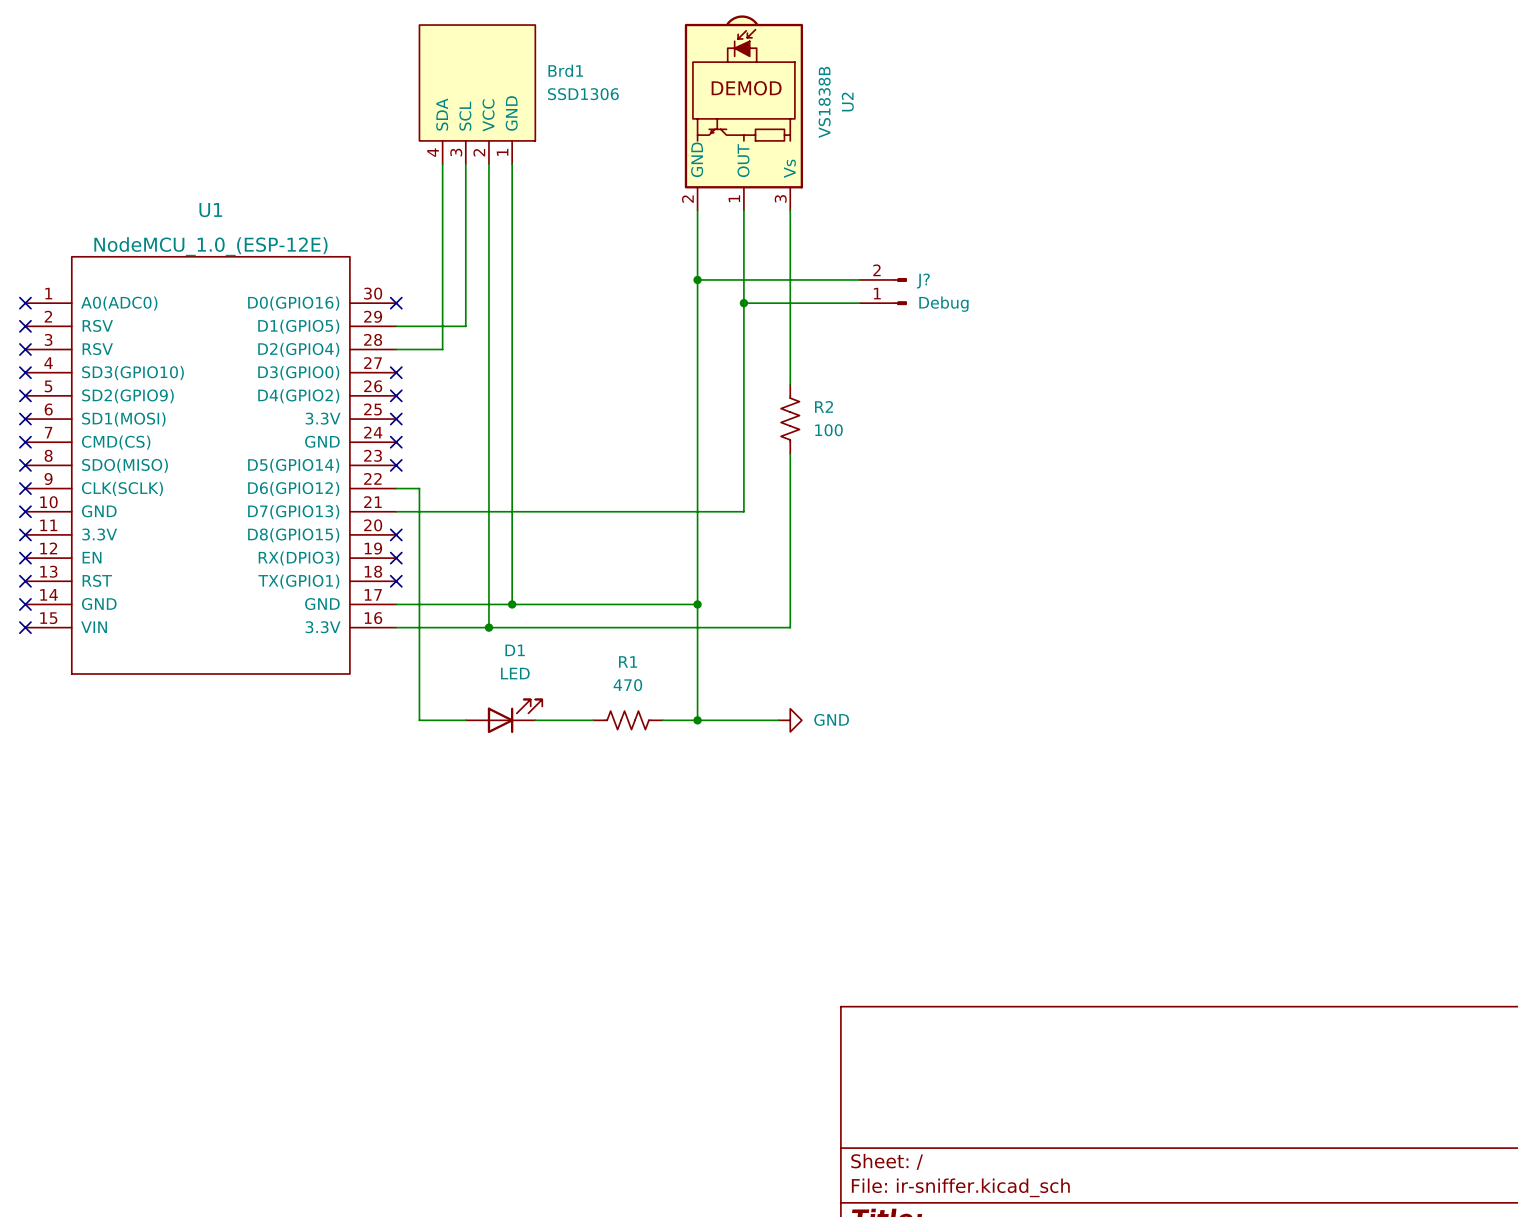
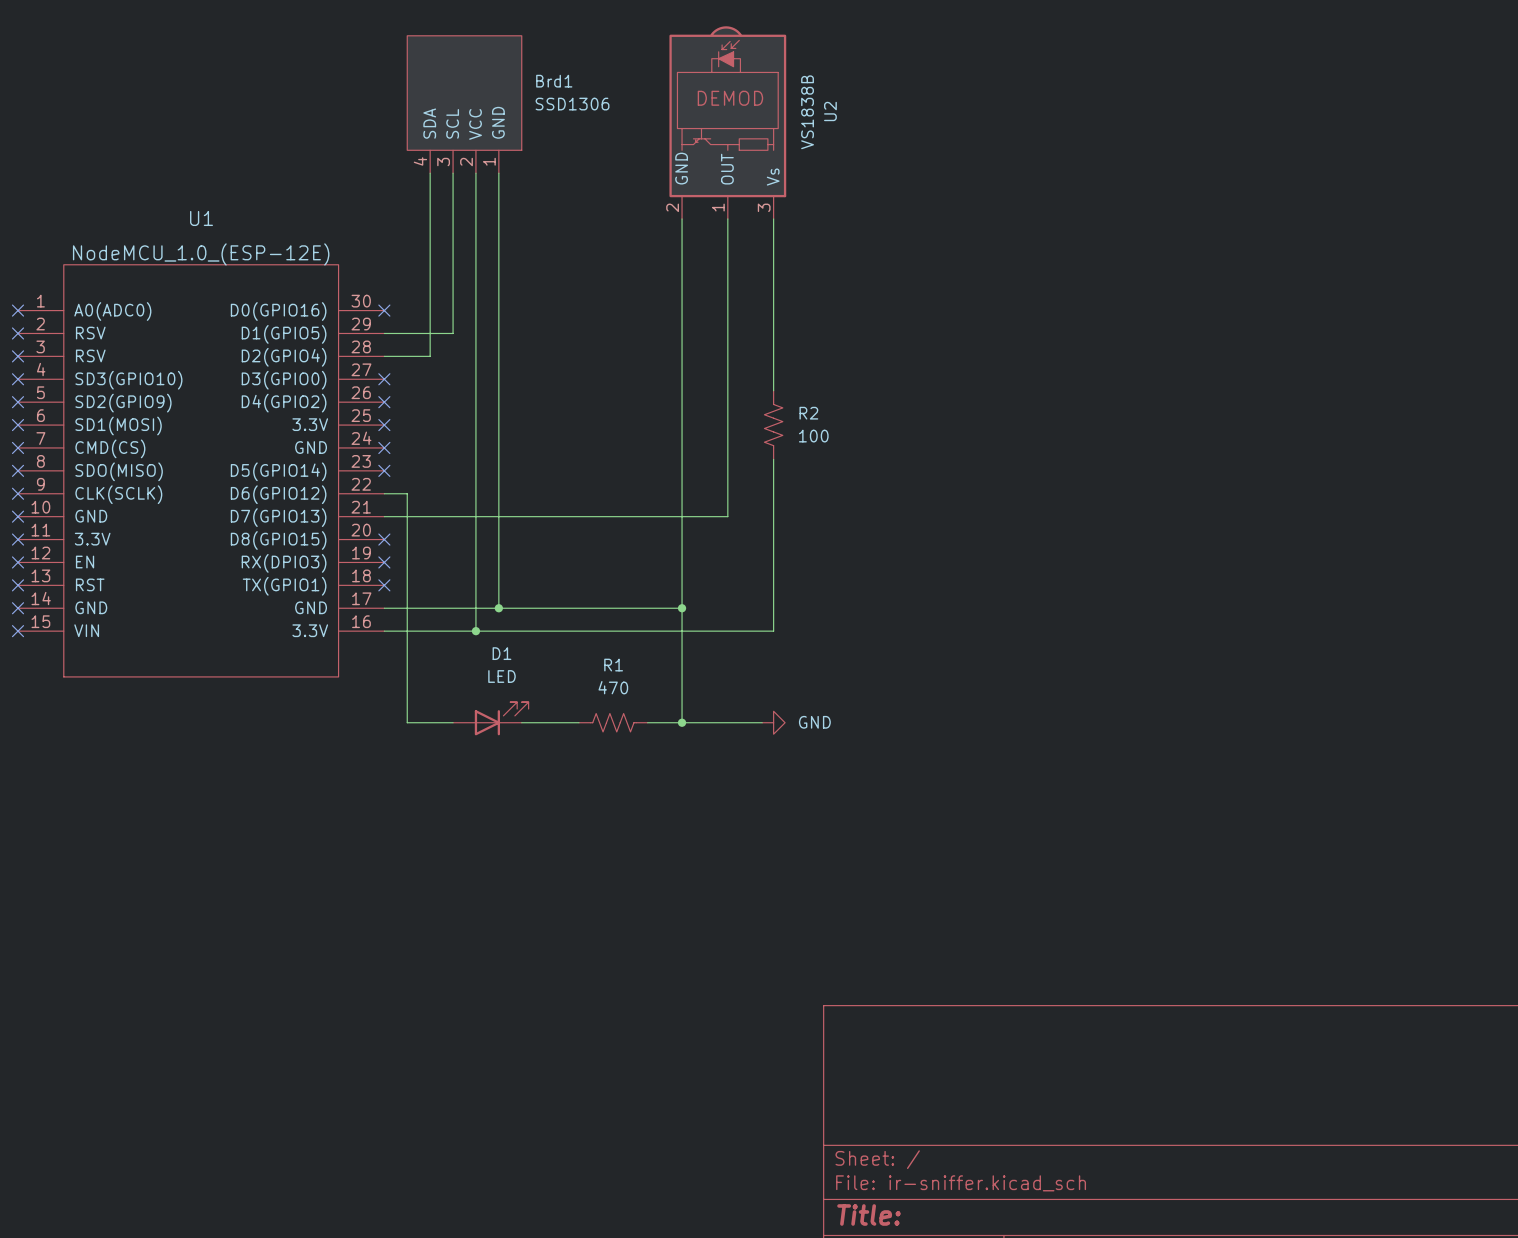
wire: (697, 279) (859, 279) -> none
junction: (697, 279) -> none
J?: Debug (883, 291) -> none
wire: (743, 303) (859, 303) -> none
junction: (743, 303) -> none

